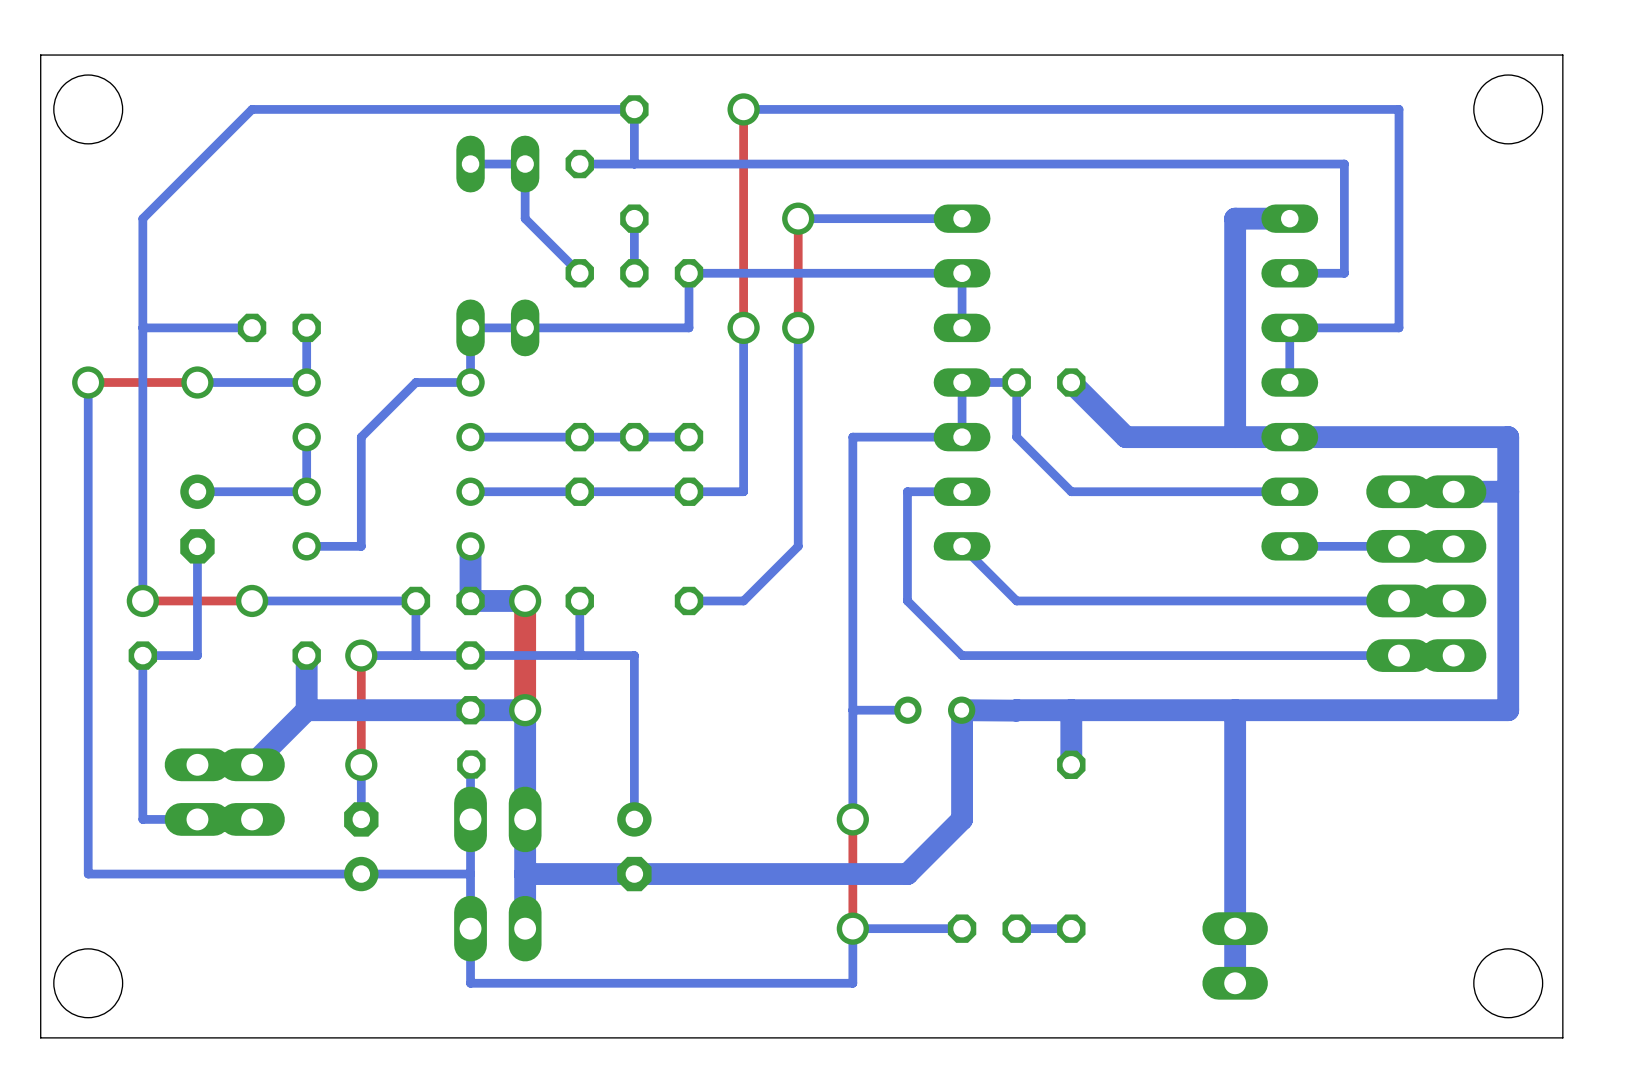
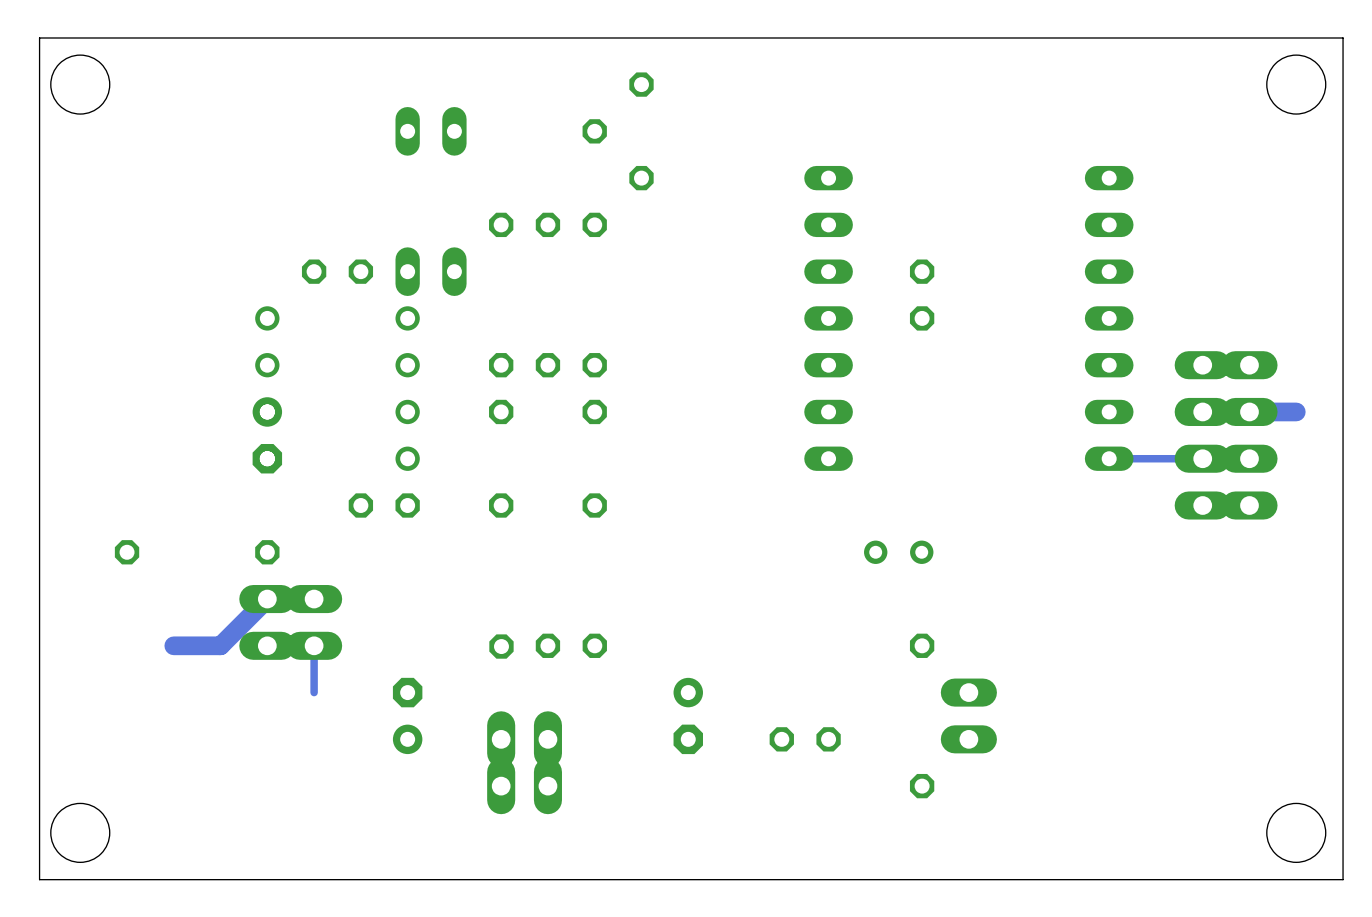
bottom track: (743, 109) (1398, 109) (1398, 327) (1289, 327) (1289, 382) -> none
top track: (743, 109) (743, 327) -> none
via: (743, 109) -> none
bottom track: (470, 164) (525, 164) (525, 218) (579, 273) -> none
bottom track: (579, 164) (1344, 164) (1344, 273) (1289, 273) -> none
part position: (607, 164) -> (618, 131)
bottom track: (634, 164) (634, 109) (252, 109) (142, 218) (142, 600) -> none
bottom track: (634, 218) (634, 273) -> none
top track: (798, 218) (798, 327) -> none
via: (798, 218) -> none
bottom track: (962, 218) (798, 218) -> none
bottom track: (1289, 218) (1235, 218) (1235, 437) -> none
bottom track: (252, 327) (142, 327) -> none
part position: (279, 327) -> (337, 271)
bottom track: (306, 327) (306, 382) (197, 382) -> none
bottom track: (743, 327) (743, 491) (470, 491) -> none
via: (743, 327) -> none
bottom track: (798, 327) (798, 546) (743, 600) (688, 600) -> none
via: (798, 327) -> none
bottom track: (962, 327) (962, 273) (688, 273) (688, 327) (470, 327) (470, 382) (415, 382) (361, 437) (361, 546) (306, 546) -> none
bottom track: (88, 382) (88, 874) (470, 874) -> none
via: (88, 382) -> none
top track: (197, 382) (88, 382) -> none
via: (197, 382) -> none
part rotation: 0° (1043, 382) -> 90° clockwise (922, 295)
bottom track: (1071, 382) (1125, 437) (1508, 437) (1508, 710) (961, 710) (962, 819) (907, 874) (525, 874) -> none
bottom track: (306, 437) (306, 491) (197, 491) -> none
bottom track: (688, 437) (470, 437) -> none
bottom track: (962, 491) (907, 491) (907, 600) (962, 655) (1453, 655) -> none
bottom track: (1289, 491) (1071, 491) (1016, 437) (1016, 382) (962, 382) (962, 437) (852, 437) (852, 819) -> none
part position: (197, 519) -> (267, 435)
part: none -> (1202, 435)
part: none -> (1249, 435)
bottom track: (197, 546) (197, 655) (142, 655) (142, 819) (252, 819) -> none
bottom track: (470, 546) (470, 600) (525, 600) -> none
bottom track: (962, 546) (1016, 600) (1453, 600) -> none
part: (1398, 573) -> none
part: (1453, 573) -> none
via: (142, 600) -> none
bottom track: (252, 600) (415, 600) (415, 655) -> none
top track: (252, 600) (142, 600) -> none
via: (252, 600) -> none
top track: (525, 600) (525, 710) -> none
via: (525, 600) -> none
bottom track: (579, 600) (579, 655) -> none
bottom track: (306, 655) (306, 710) (525, 710) (525, 928) -> none
bottom track: (361, 655) (634, 655) (634, 819) -> none
top track: (361, 655) (361, 764) -> none
via: (361, 655) -> none
part rotation: 0° (470, 709) -> 90° clockwise (548, 646)
part position: (470, 709) -> (548, 646)
via: (525, 710) -> none
bottom track: (907, 710) (852, 710) -> none
part position: (934, 710) -> (898, 552)
bottom track: (1071, 710) (1071, 764) -> none
bottom track: (1235, 710) (1235, 983) -> none
part: none -> (267, 622)
part: none -> (314, 622)
via: (361, 764) -> none
bottom track: (471, 764) (470, 983) (852, 983) (852, 928) (962, 928) -> none
part: (197, 792) -> none
part: (252, 792) -> none
part: (497, 819) -> none
top track: (852, 819) (852, 928) -> none
via: (852, 819) -> none
part: (361, 846) -> none
part: none -> (407, 715)
part: (634, 846) -> none
part: none -> (688, 715)
part: none -> (524, 739)
part: (497, 928) -> none
part: none -> (524, 786)
via: (852, 928) -> none
part position: (989, 928) -> (805, 739)
bottom track: (1071, 928) (1016, 928) -> none
part position: (1235, 955) -> (968, 715)

